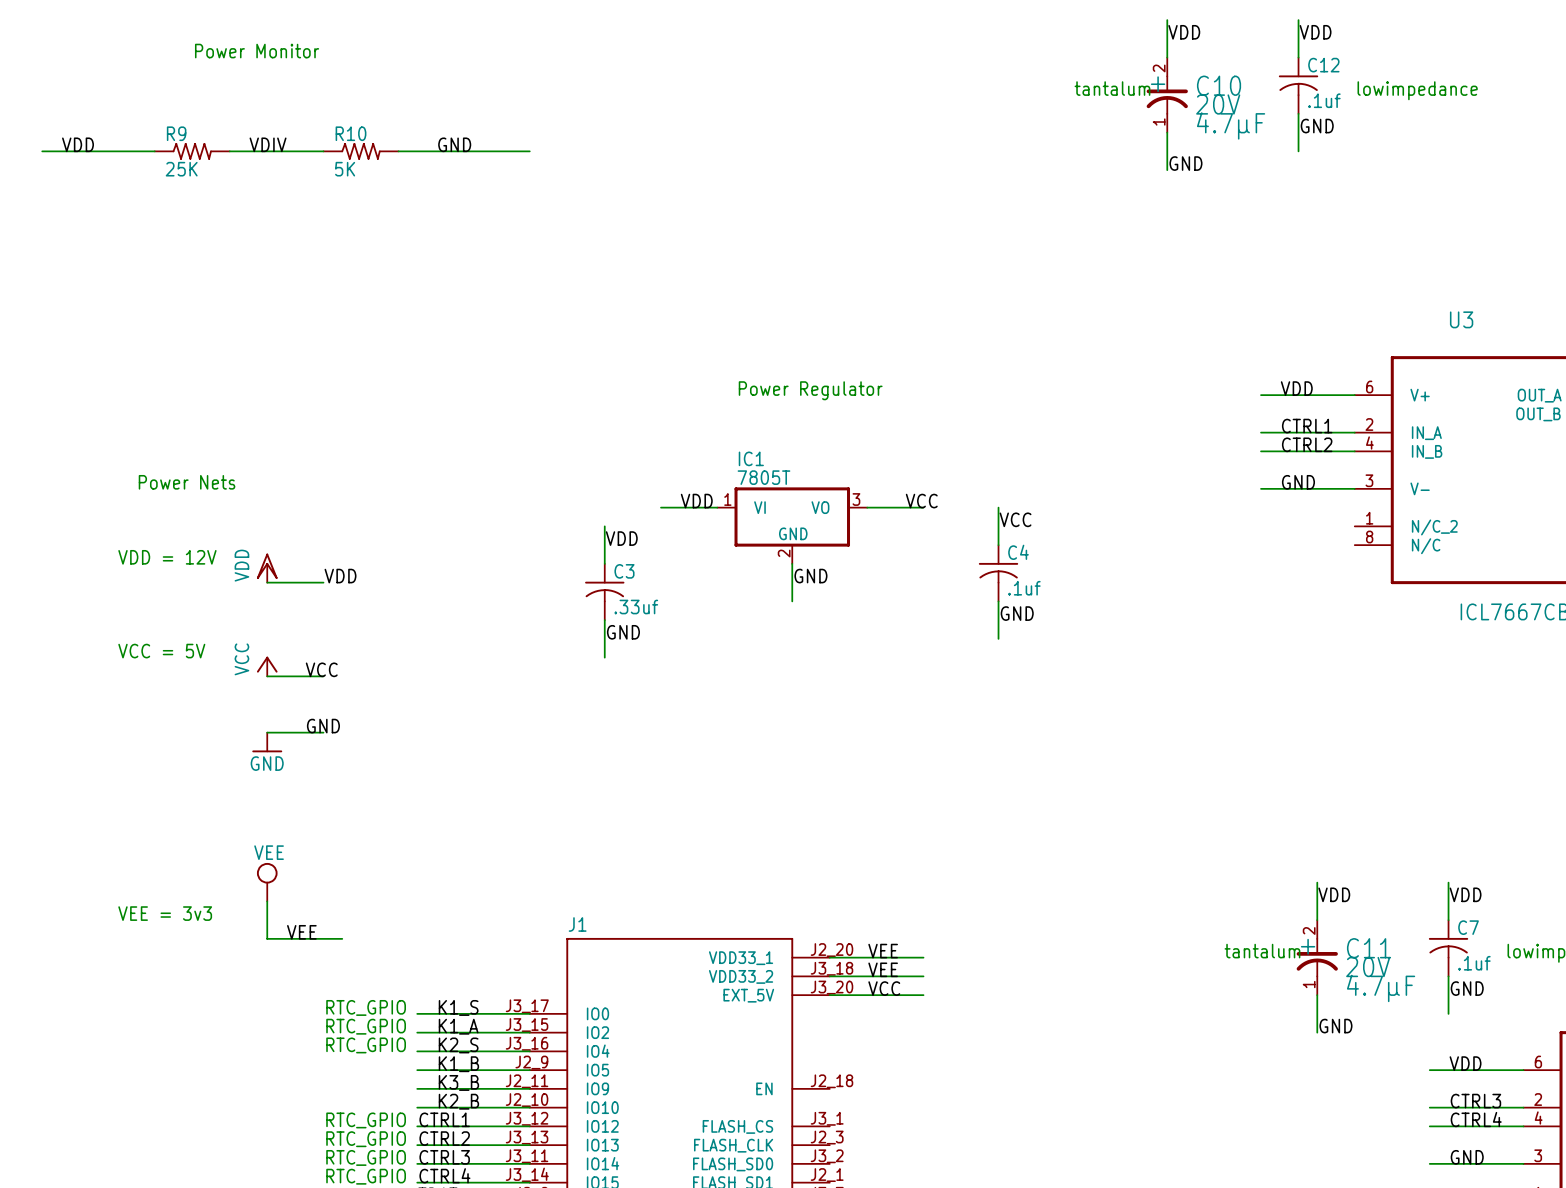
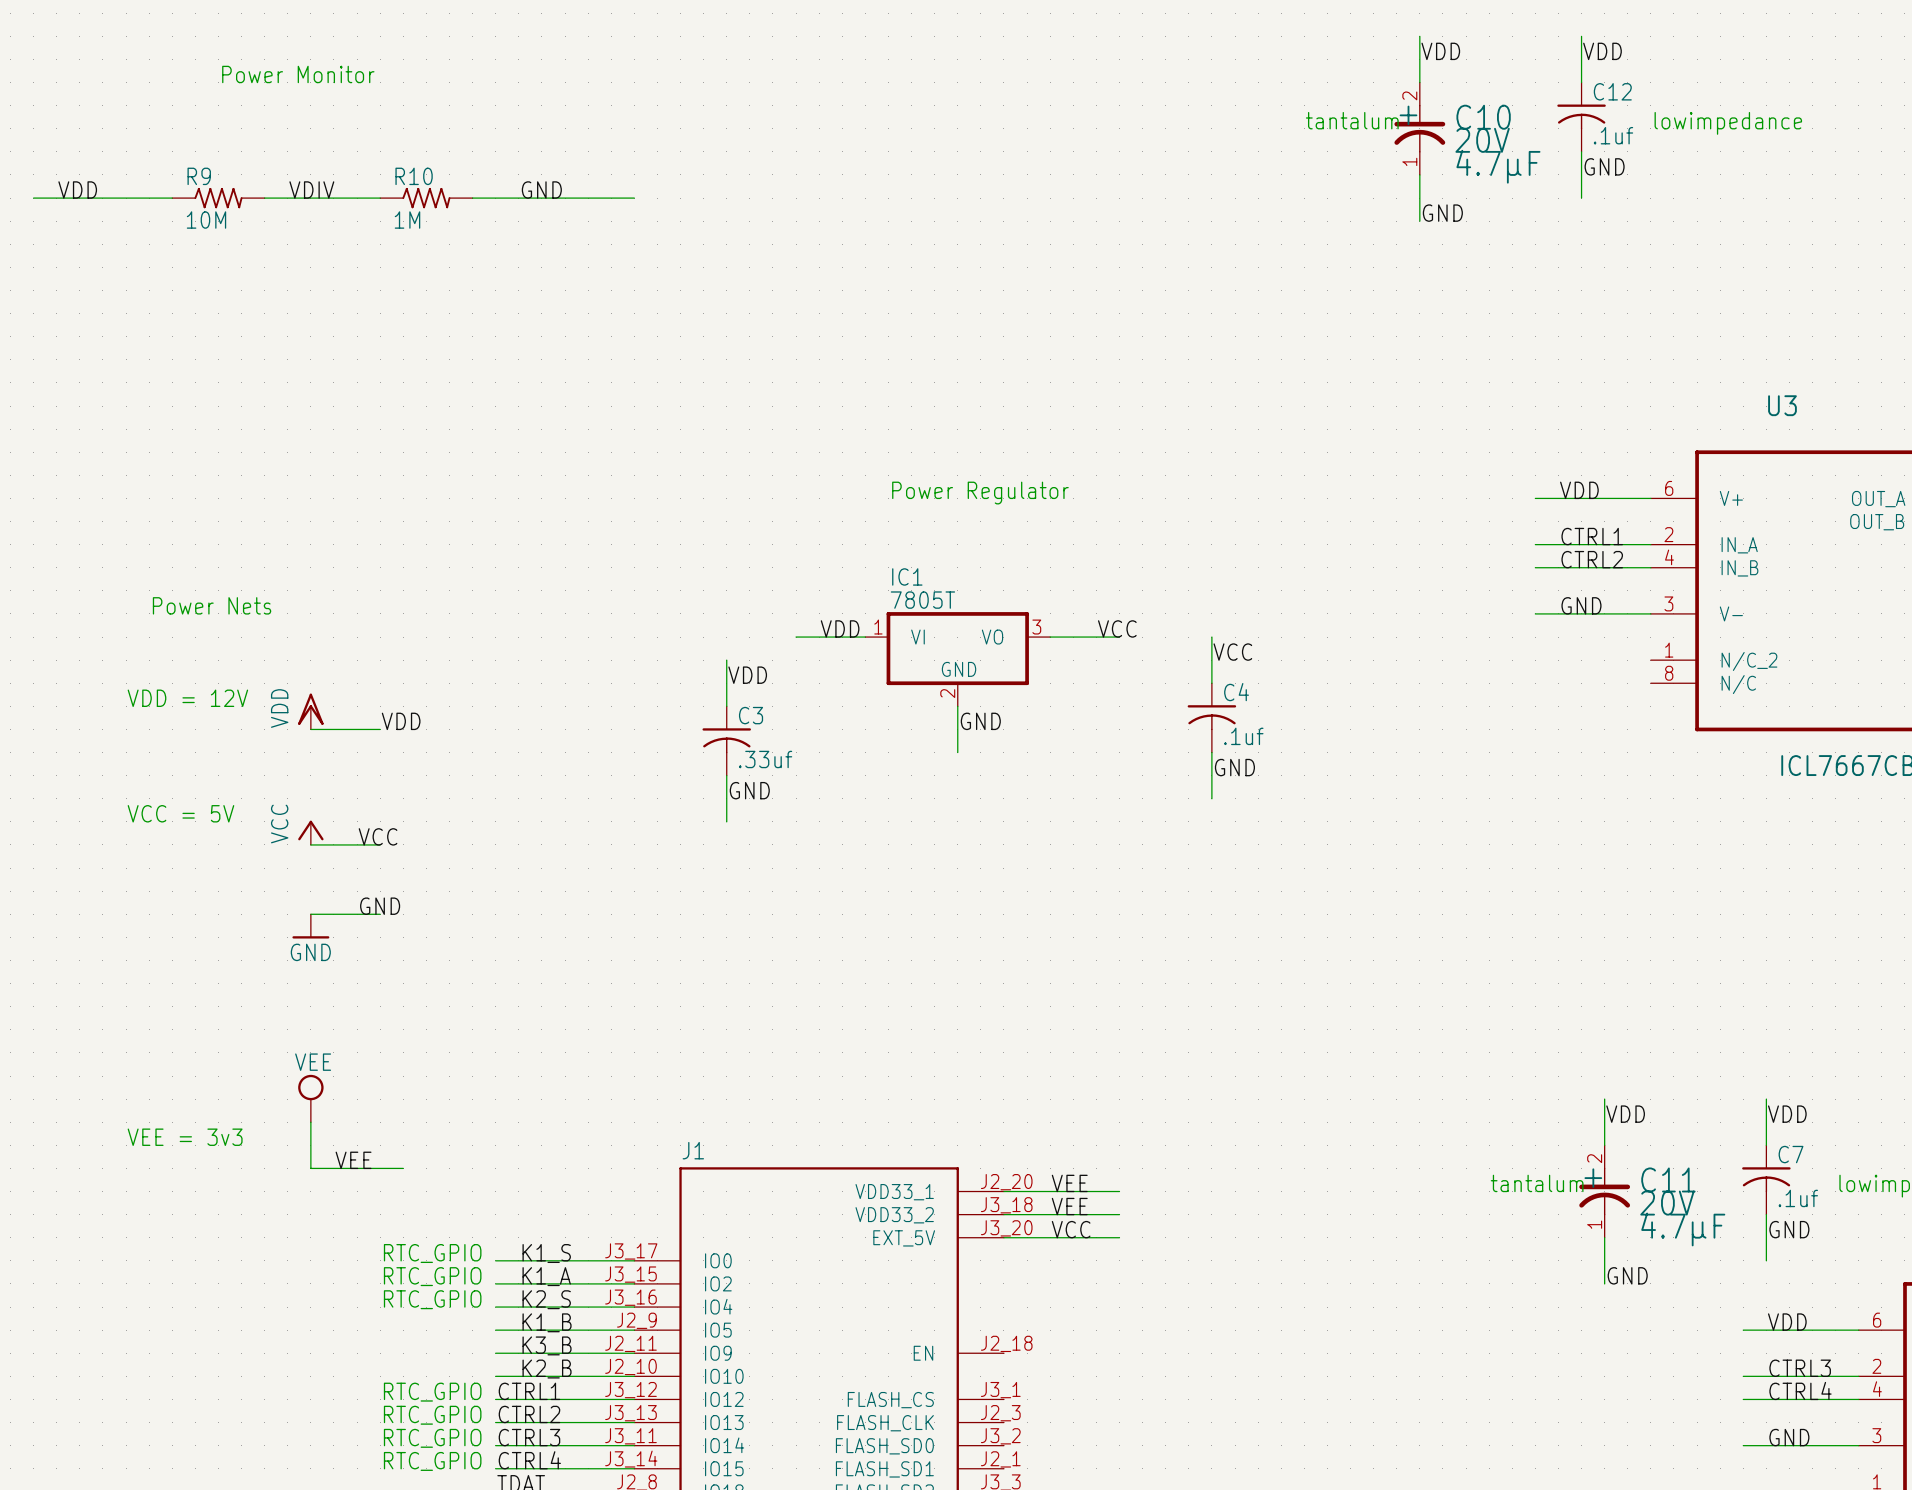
R9 value: 25K (181, 169) -> 10M (206, 220)
R10 value: 5K (345, 169) -> 1M (407, 220)

